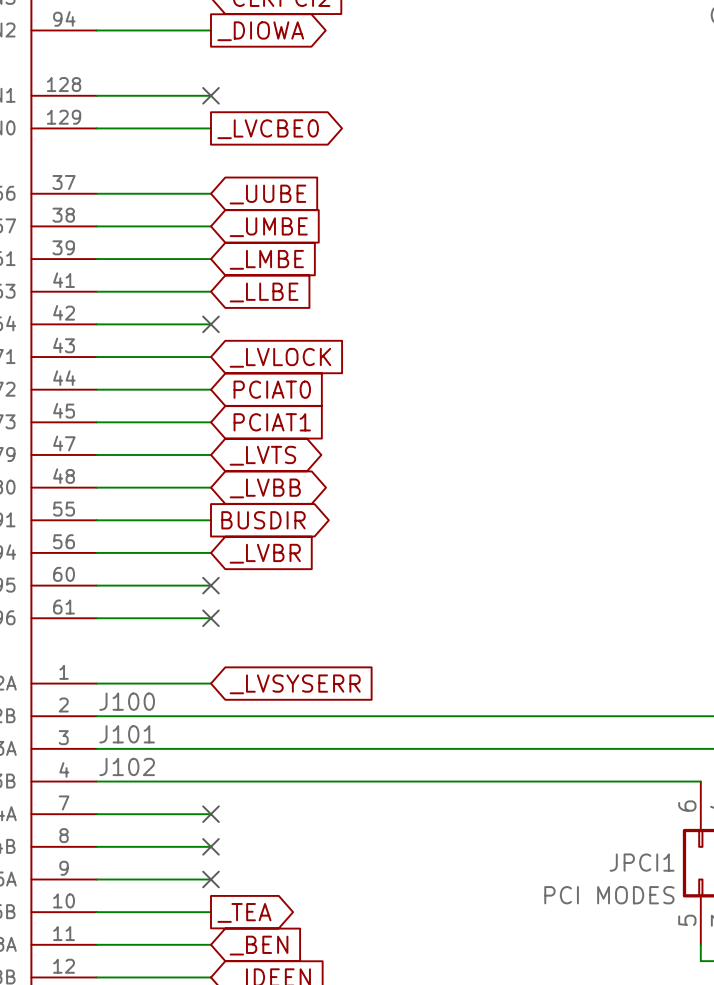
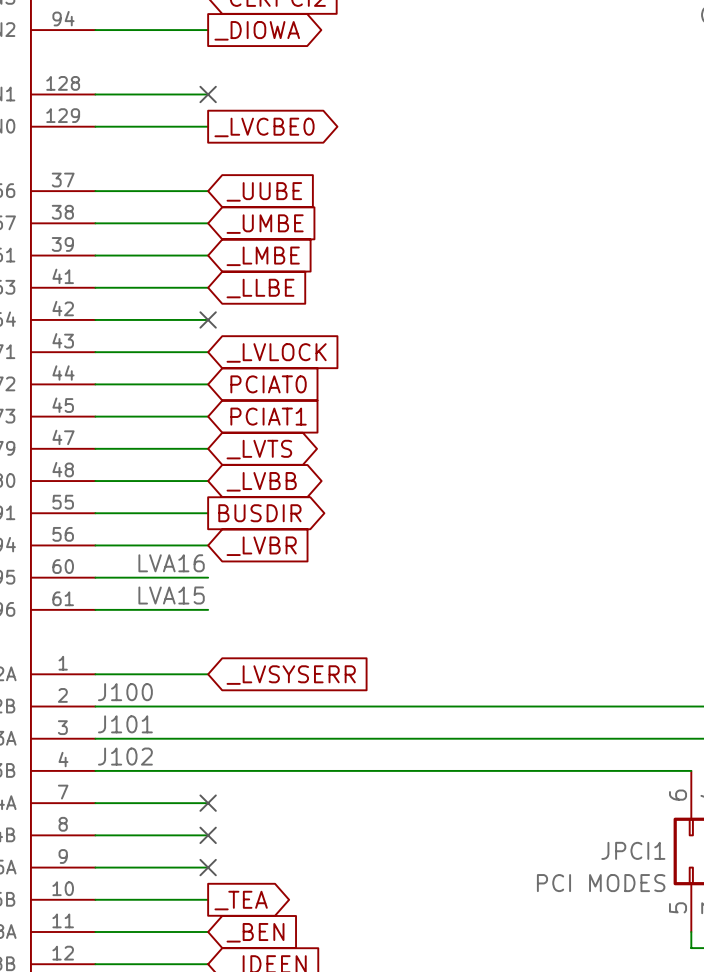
label: none -> LVA16 (171, 563)
no-connect mark: (210, 585) -> none
label: none -> LVA15 (171, 595)
no-connect mark: (210, 618) -> none

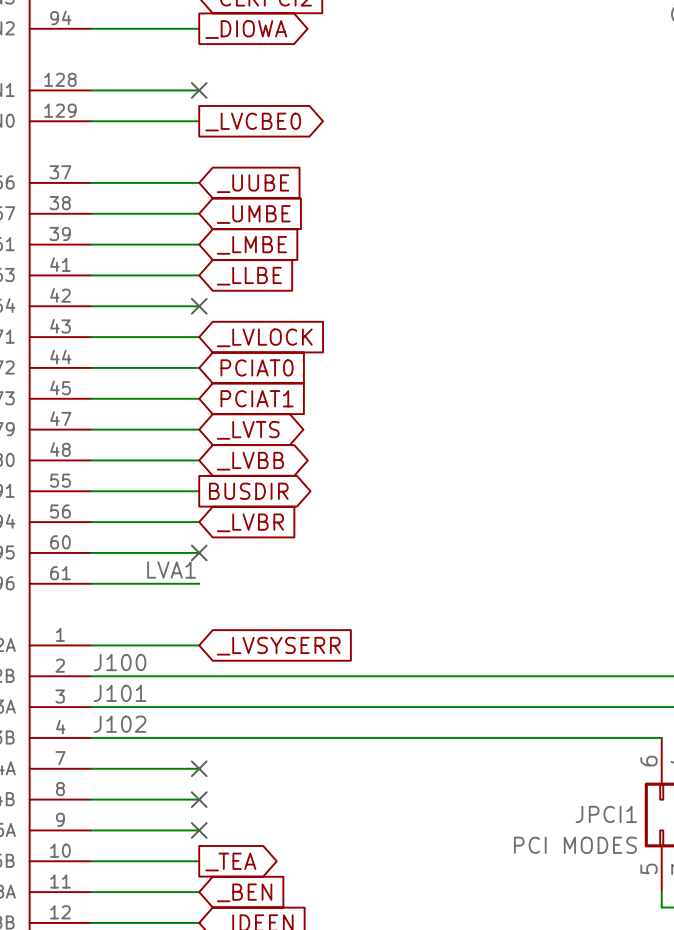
label: LVA16 (171, 563) -> none
no-connect mark: none -> (199, 552)
label: LVA15 (171, 595) -> LVA1 (171, 570)

